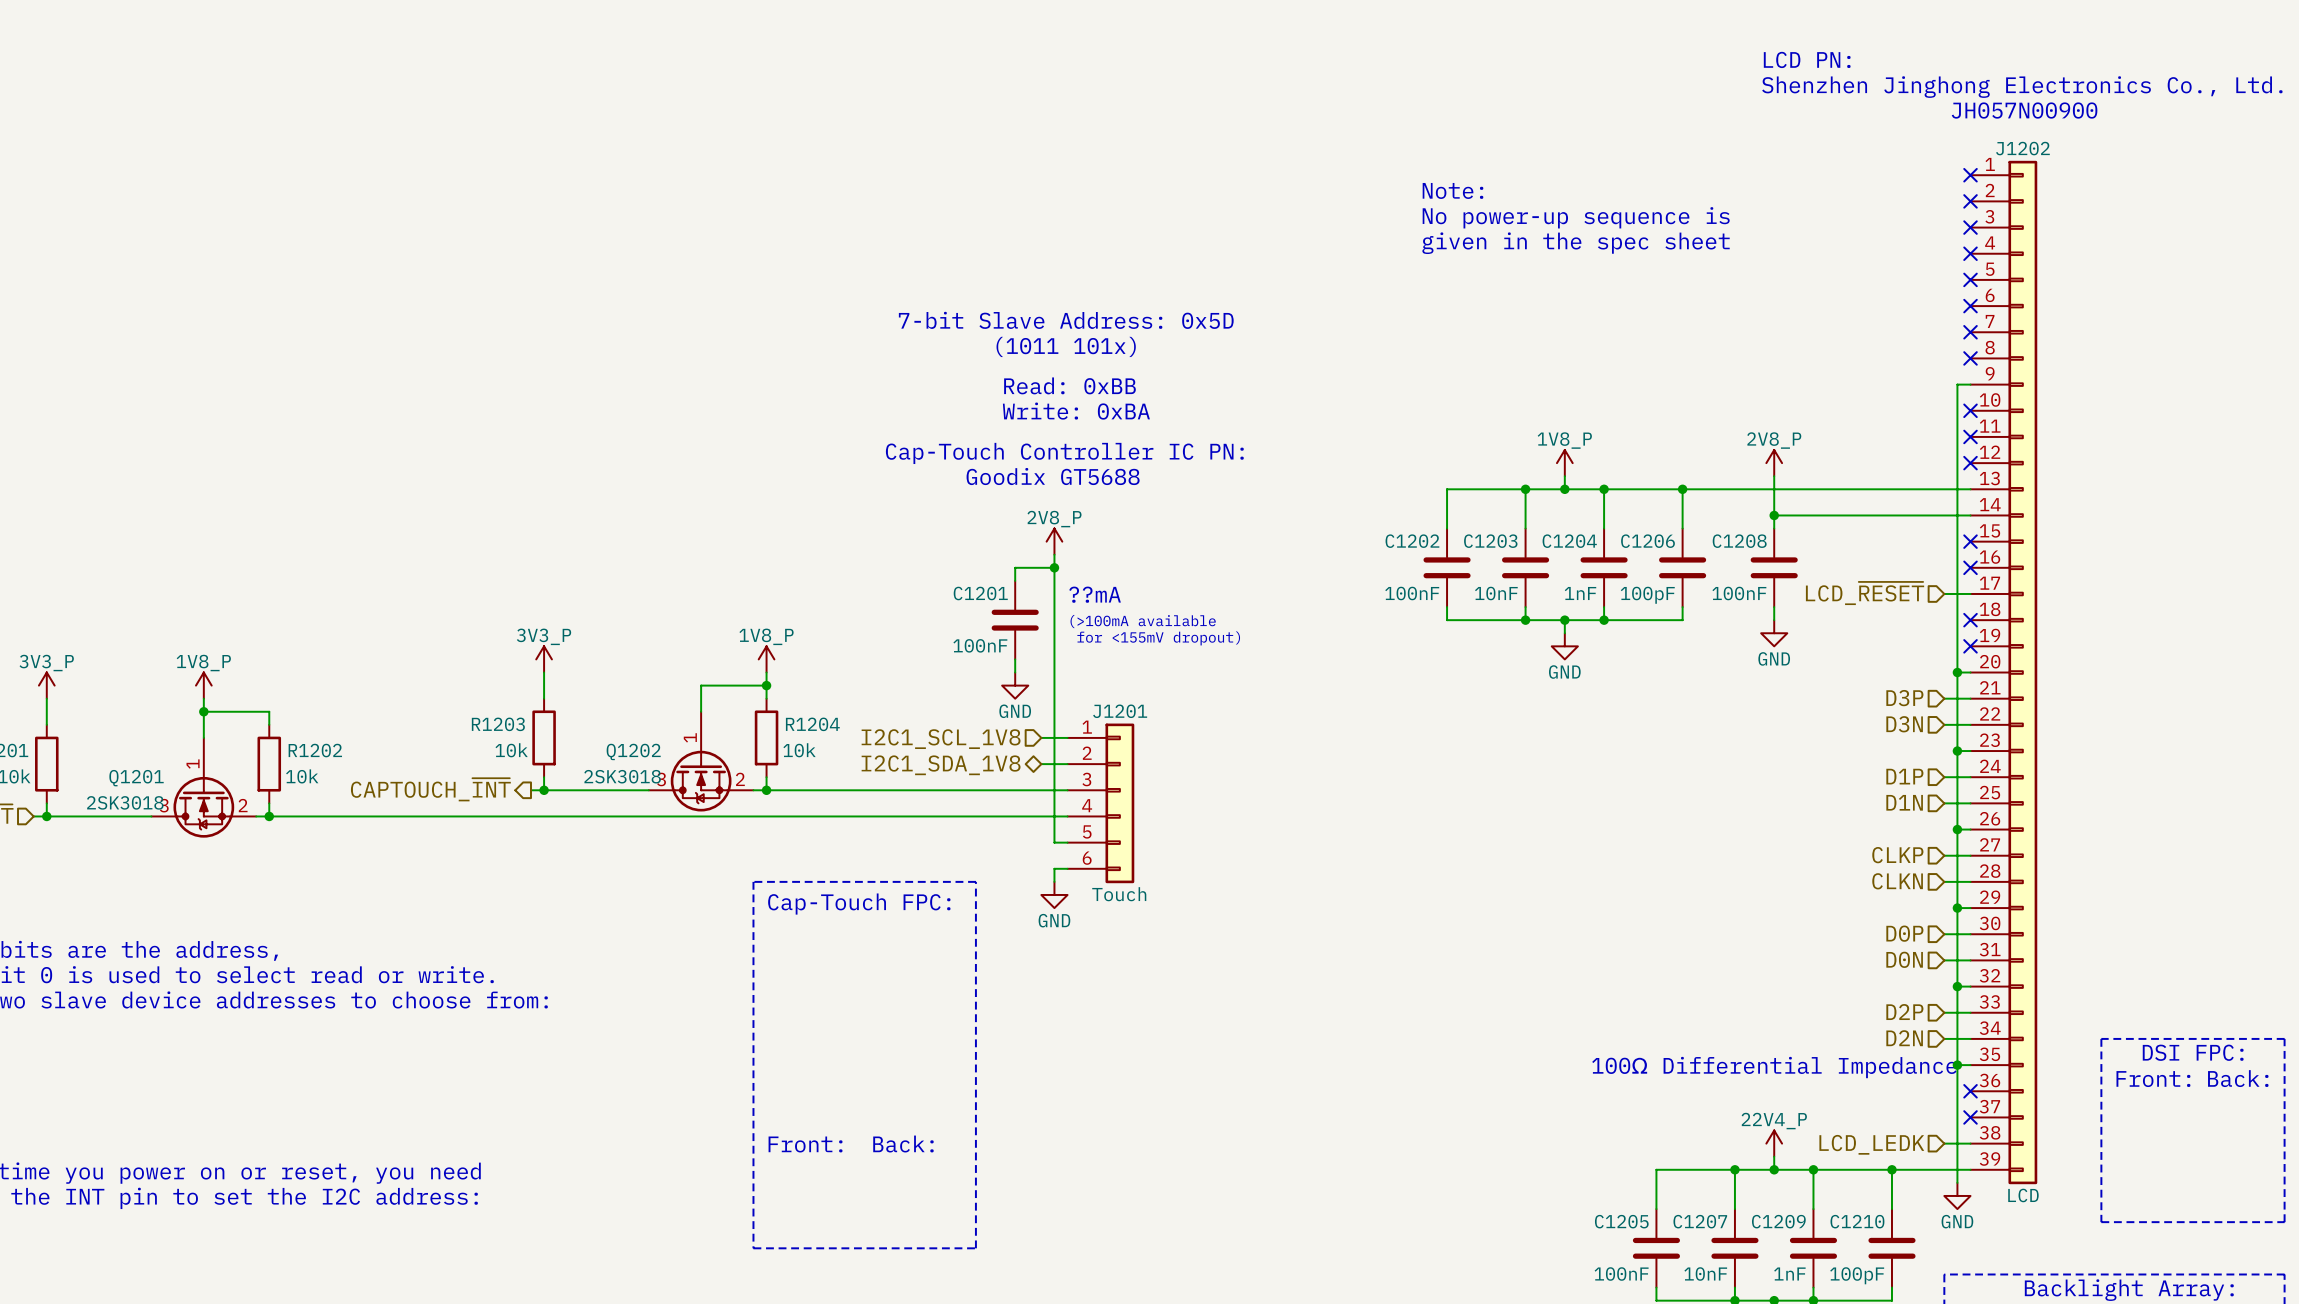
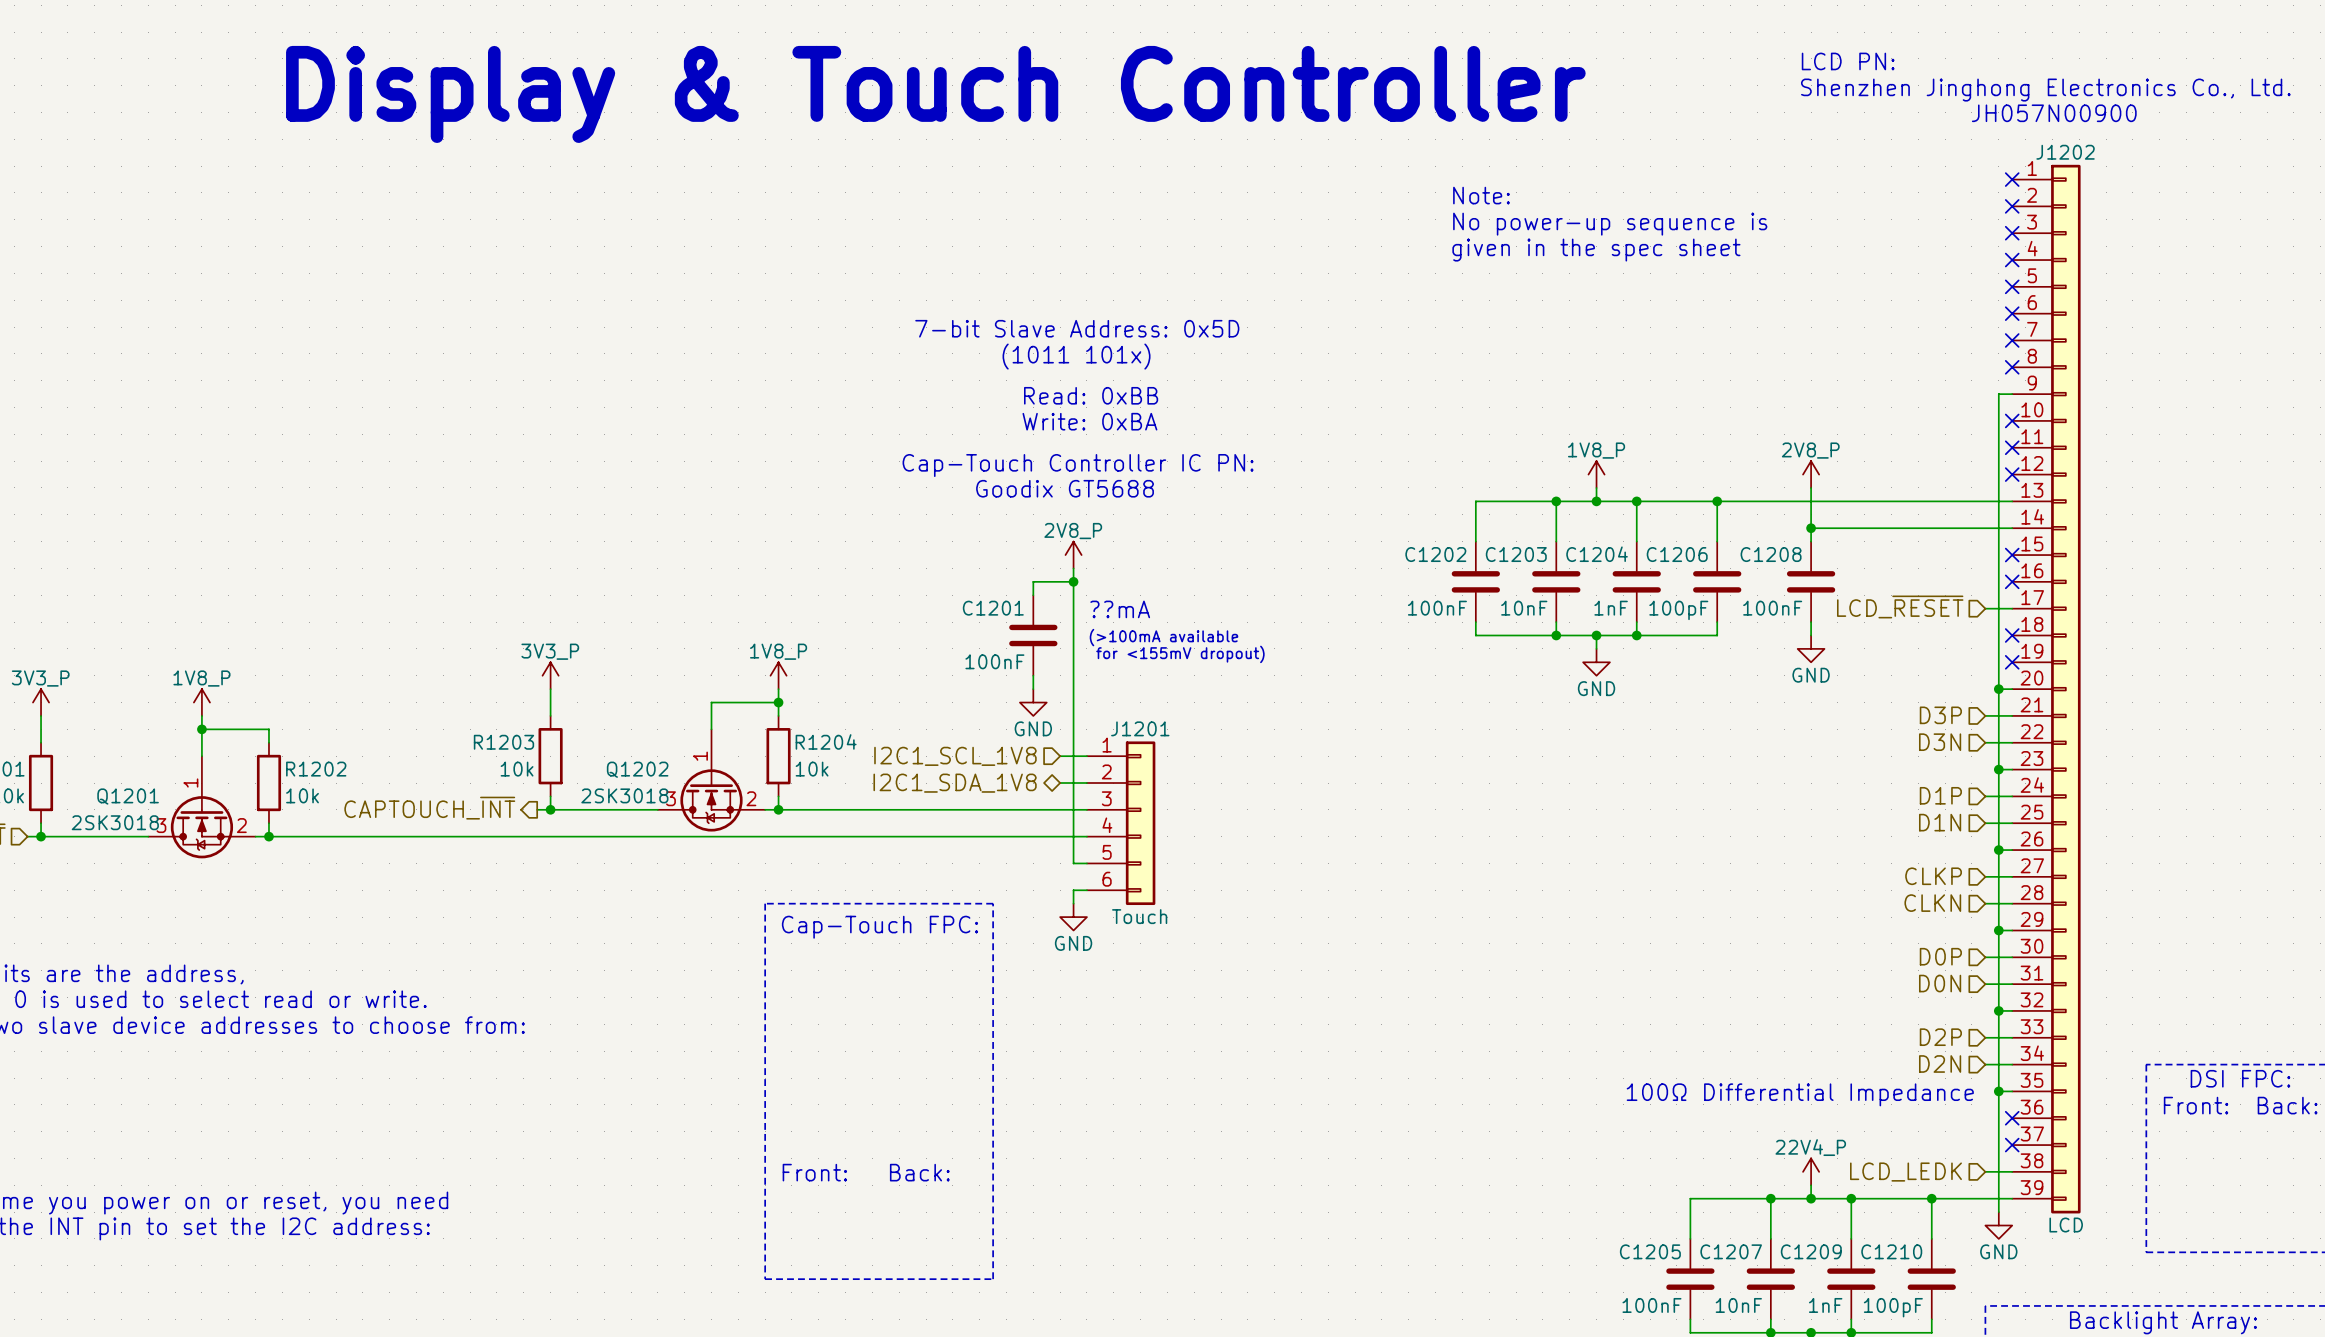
text: none -> Display & Touch Controller (935, 94)

